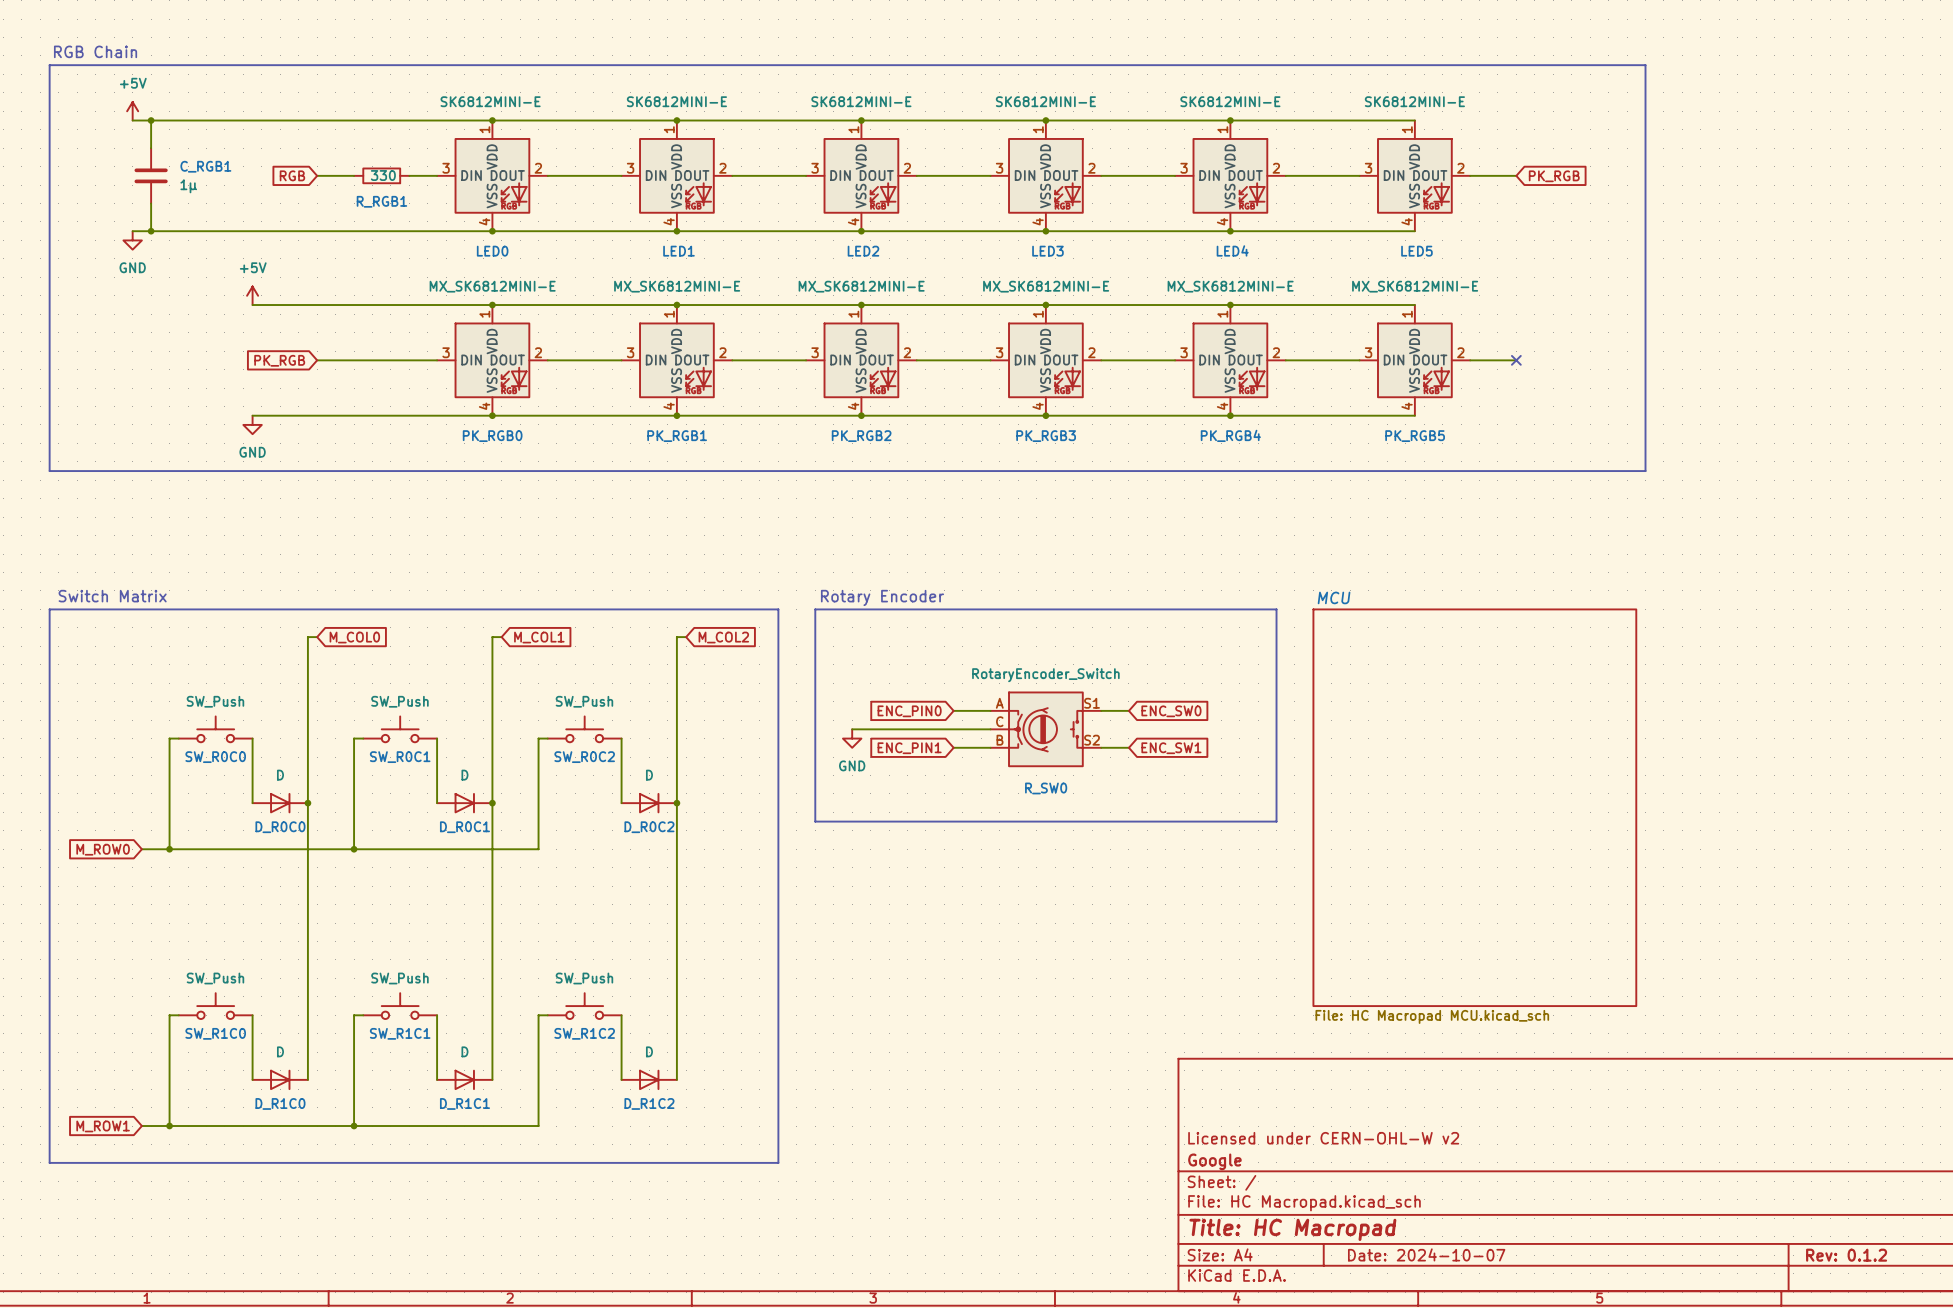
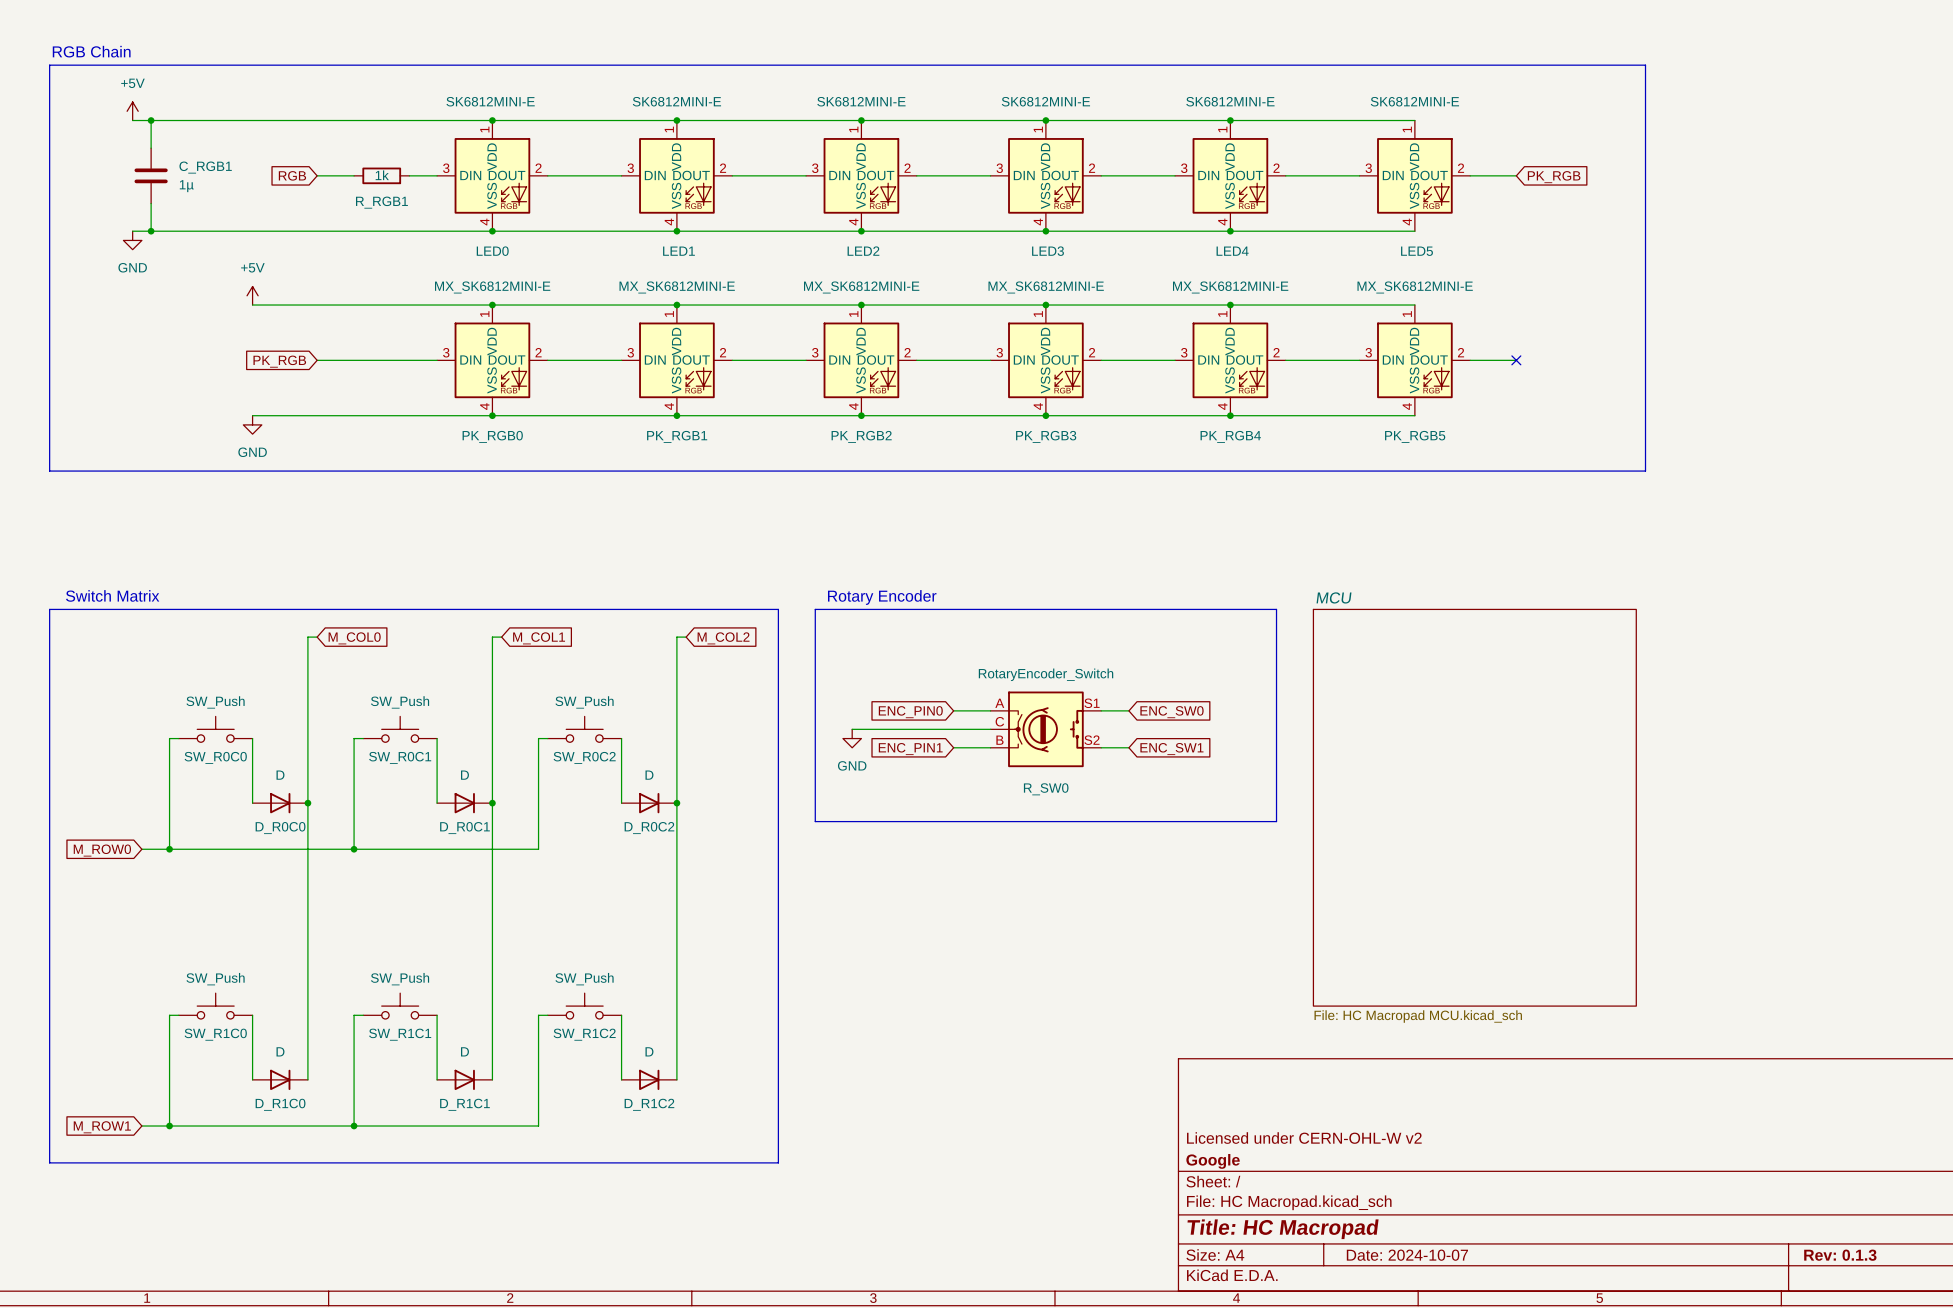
R_RGB1 value: 330 (383, 175) -> 1k (382, 175)
title block: Rev: 0.1.2 (1846, 1255) -> Rev: 0.1.3 (1840, 1255)

